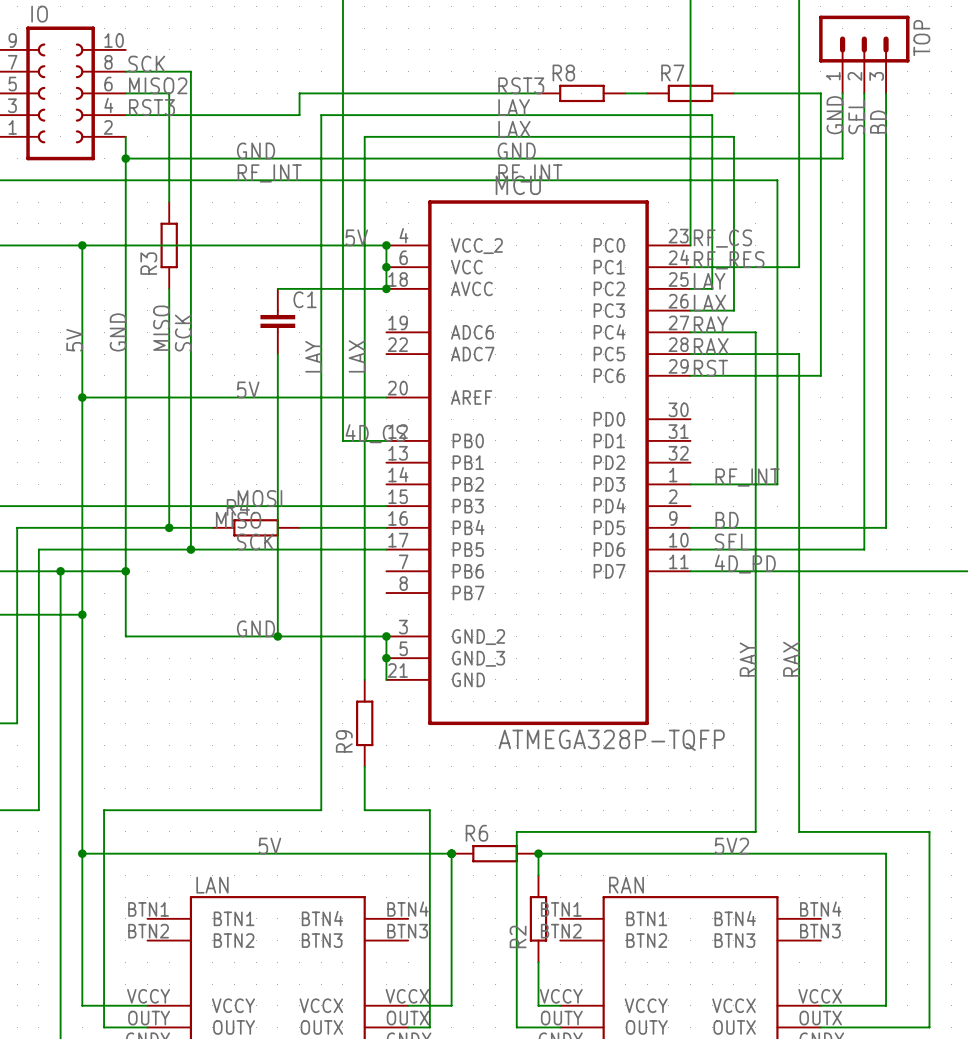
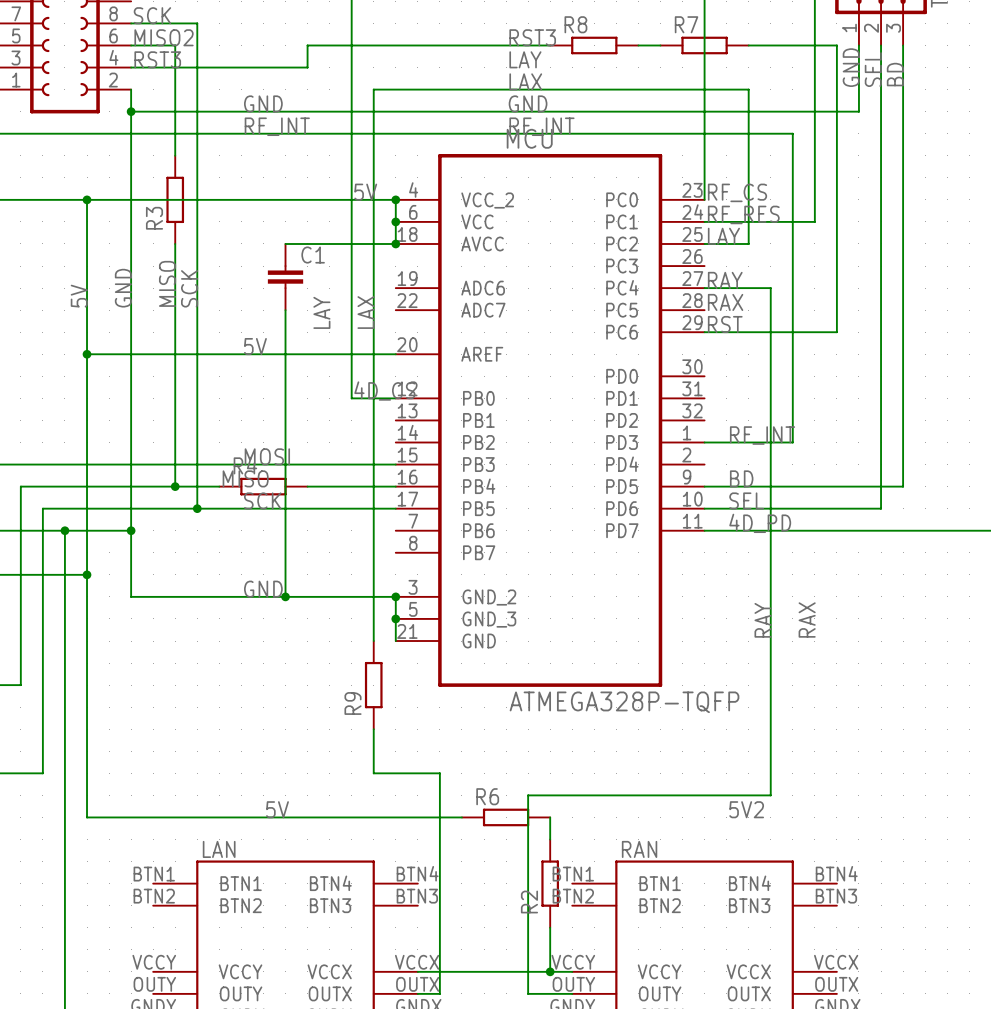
wire: (712, 288) (712, 115) (321, 115) (321, 810) (104, 810) (104, 1027) (147, 1027) -> none
wire: (733, 288) (733, 310) (690, 310) -> (748, 243) (726, 243)
label: LAX (709, 303) -> none
wire: (690, 354) (799, 354) (799, 831) (929, 831) (929, 1027) (820, 1027) -> none
wire: (82, 853) (82, 1005) (147, 1005) -> none
junction: (82, 853) -> none
wire: (451, 853) (451, 1005) -> (550, 971) (461, 971)
junction: (451, 853) -> none
wire: (538, 853) (886, 853) (886, 1005) (820, 1005) -> none
junction: (538, 853) -> none
junction: none -> (550, 971)

